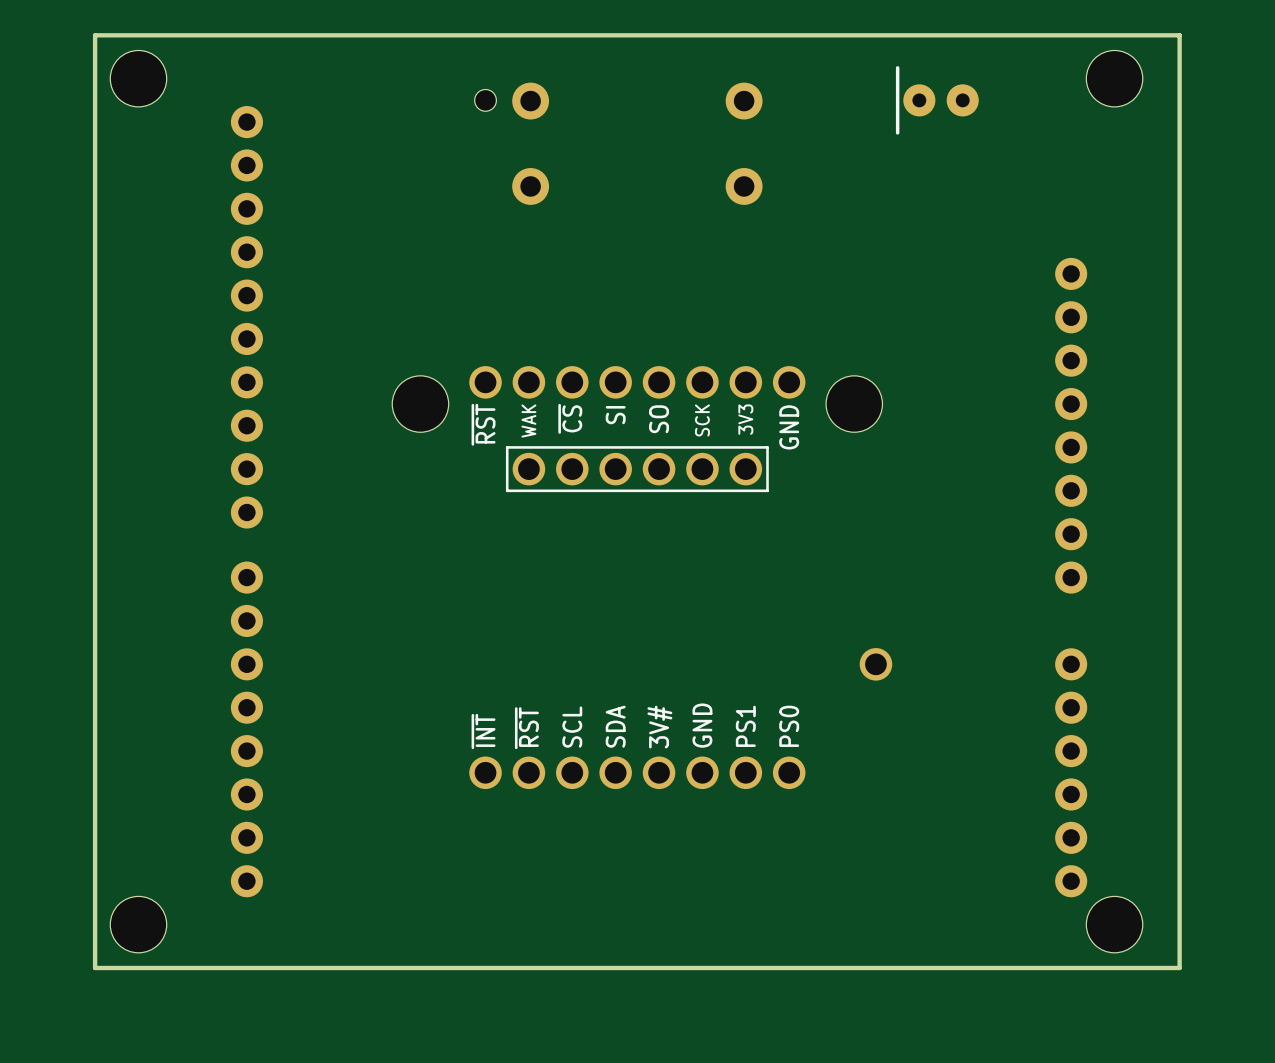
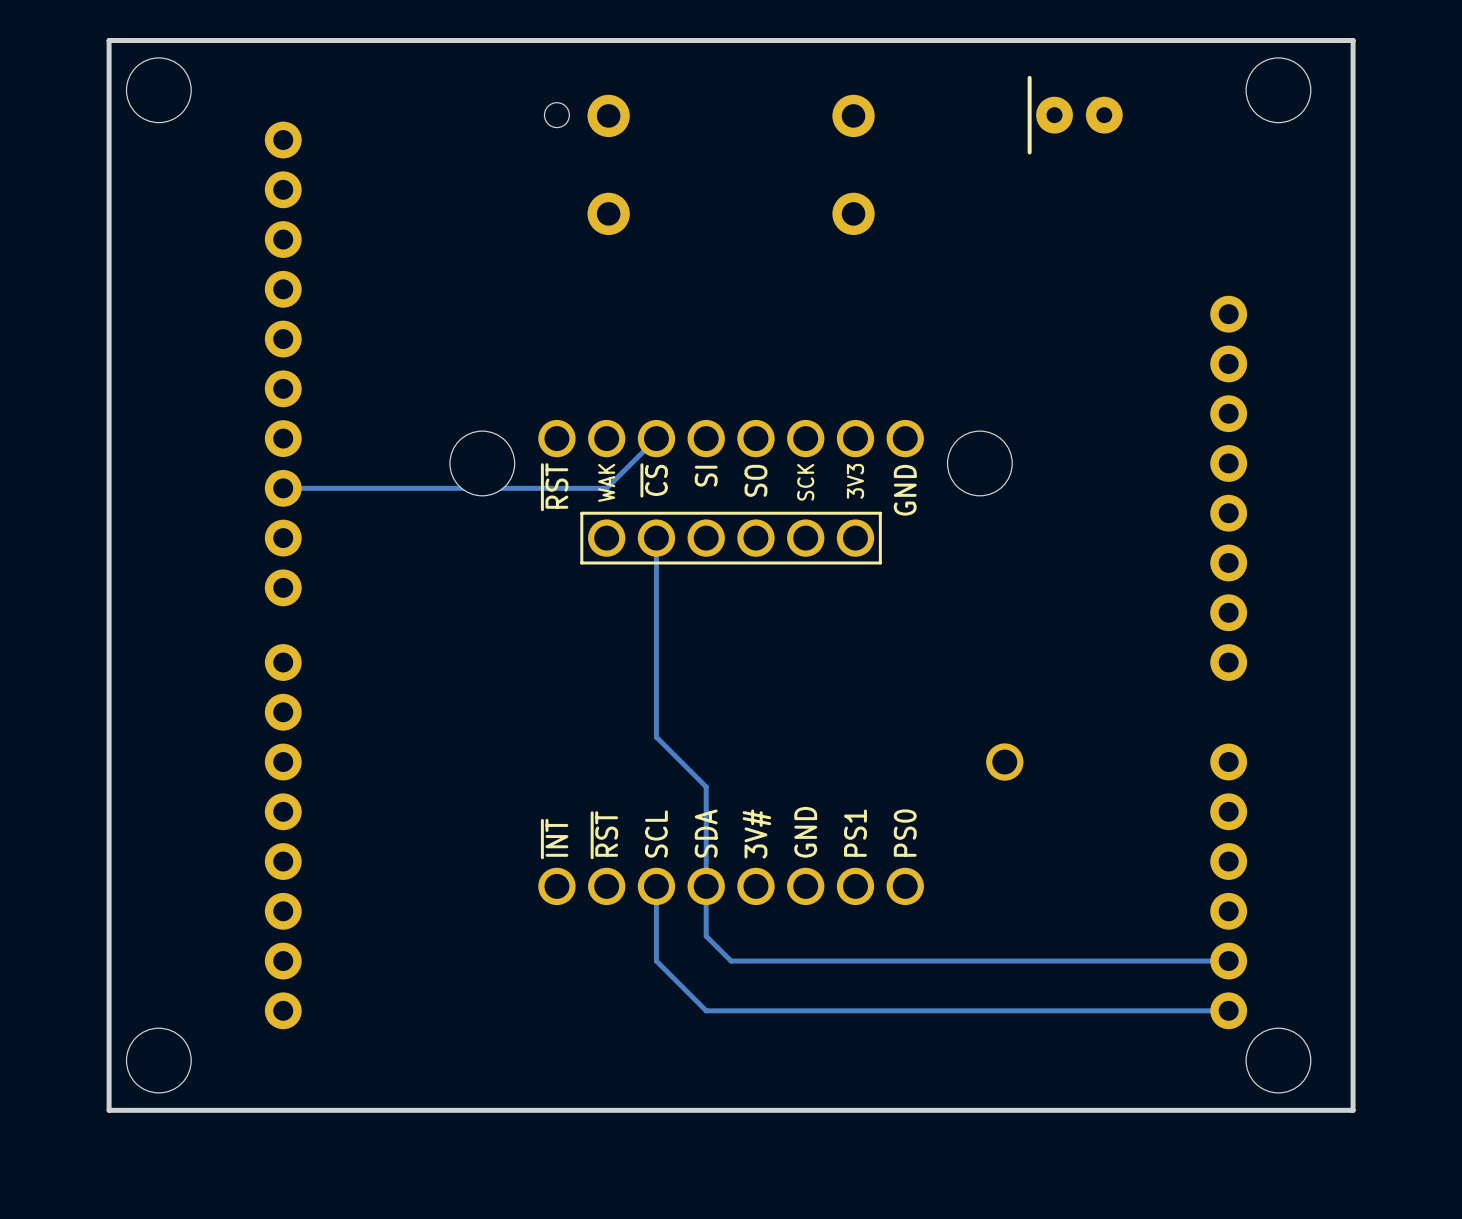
track: none -> (656, 438) (606, 488) (283, 488)
track: none -> (656, 538) (656, 737) (706, 786) (706, 936) (731, 961) (1228, 961)
track: none -> (656, 886) (656, 961) (706, 1010) (1228, 1010)

